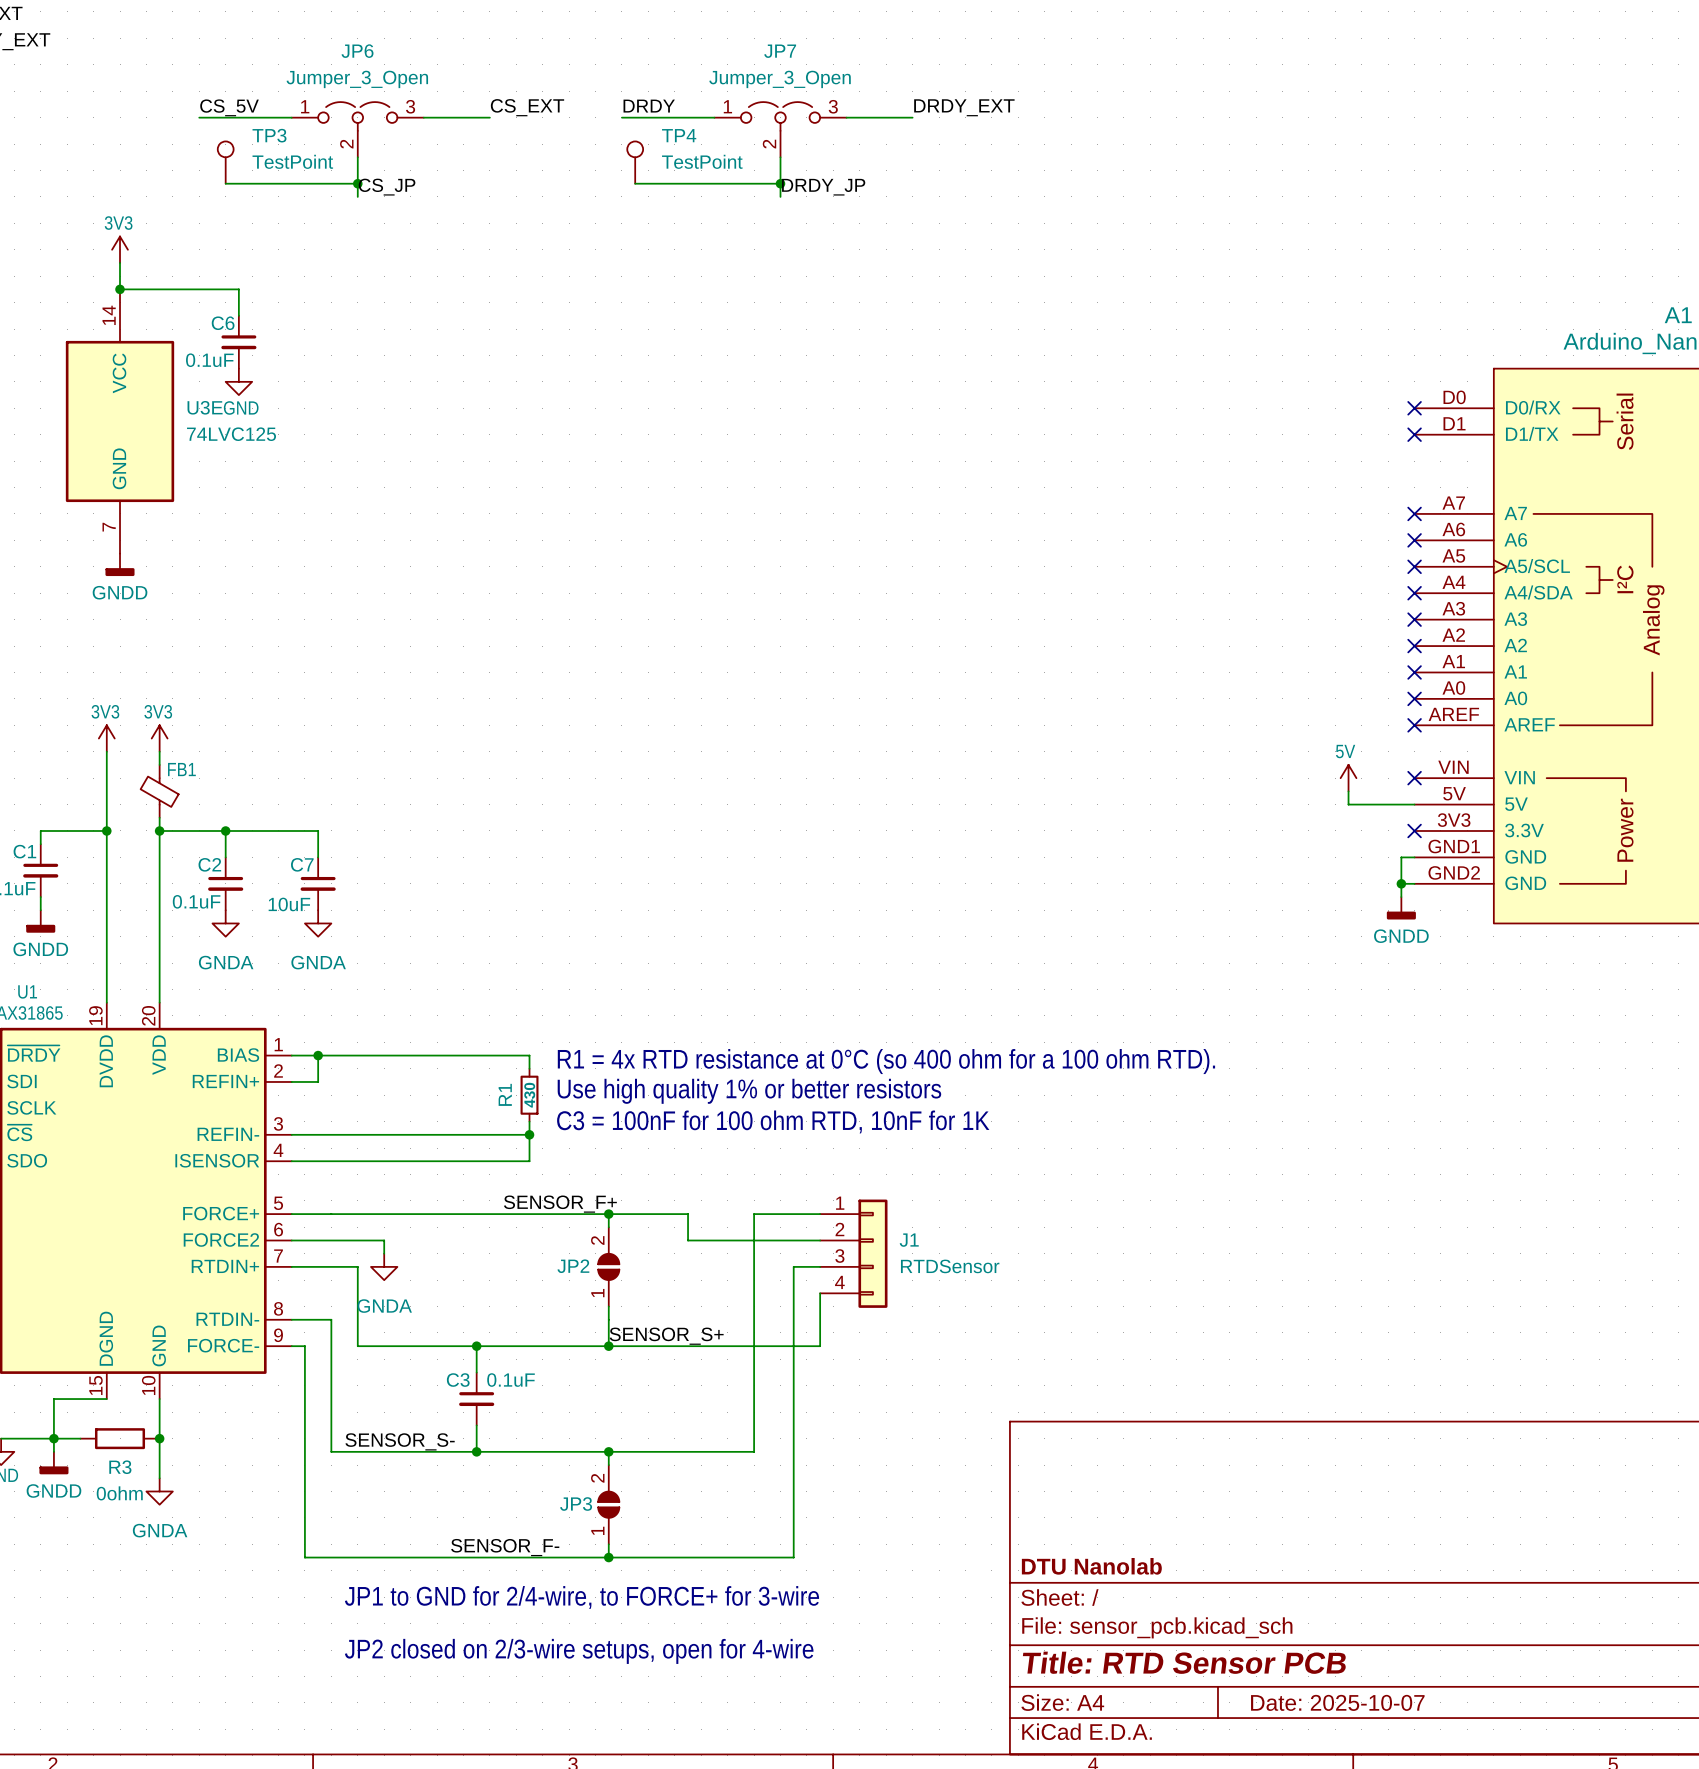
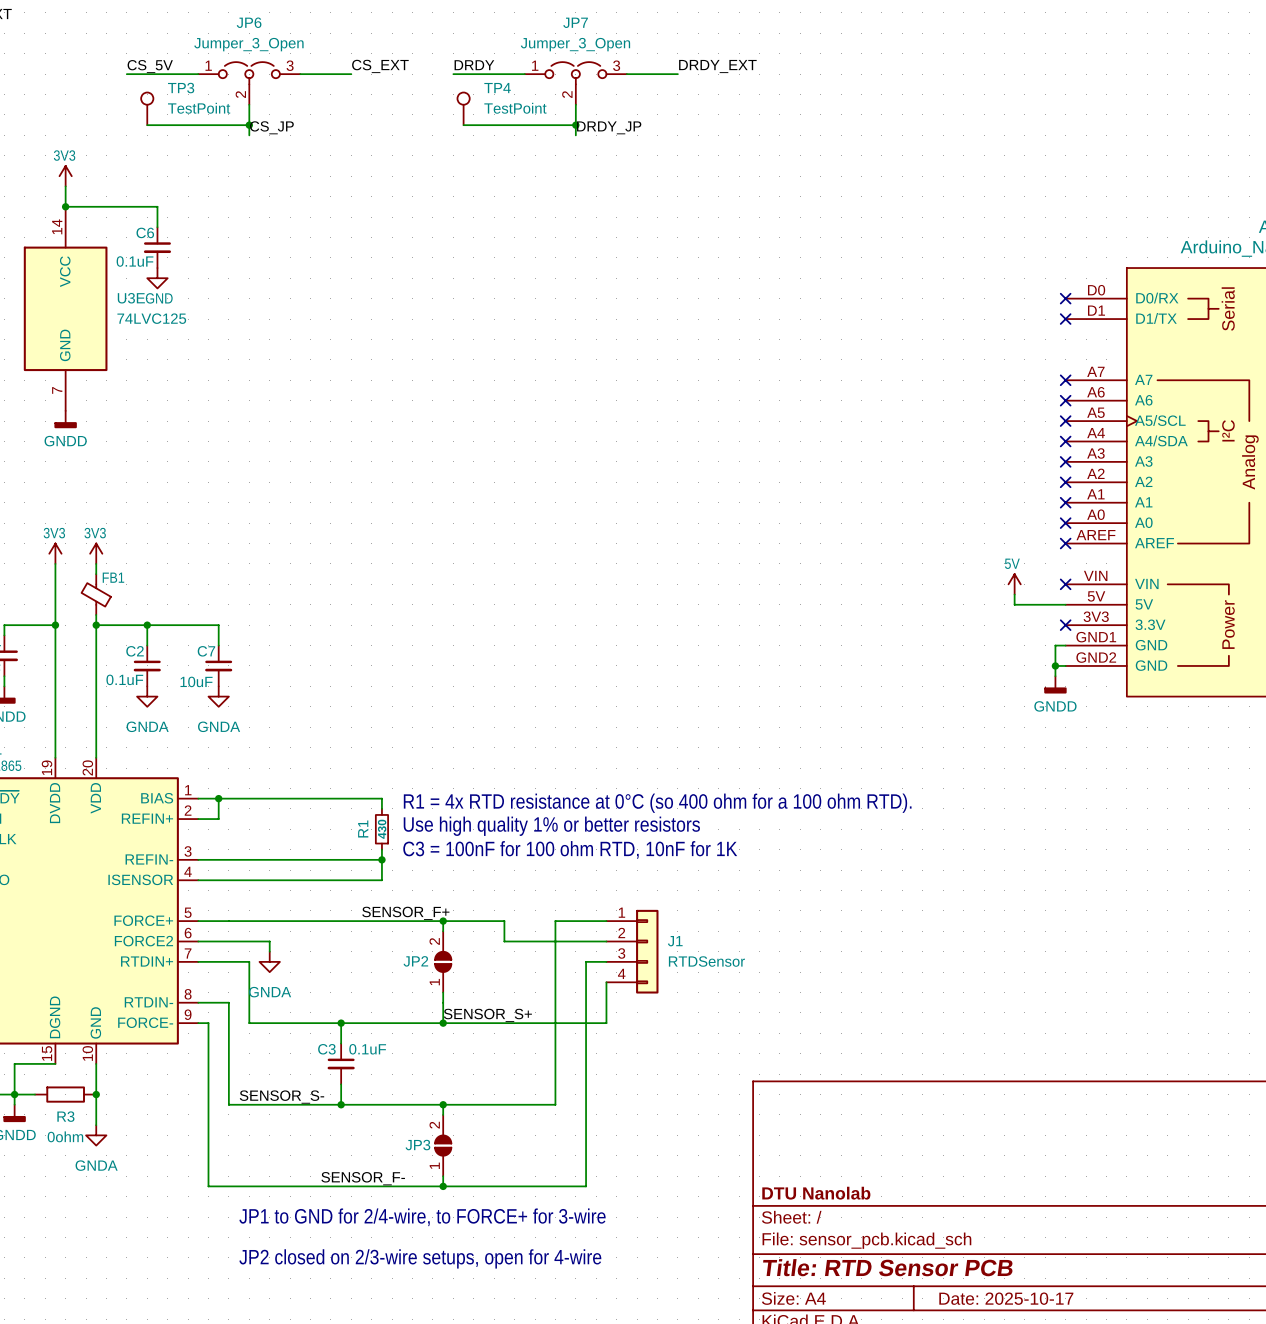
title block: Date: 2025-10-07 (1337, 1702) -> Date: 2025-10-17 (1006, 1298)

